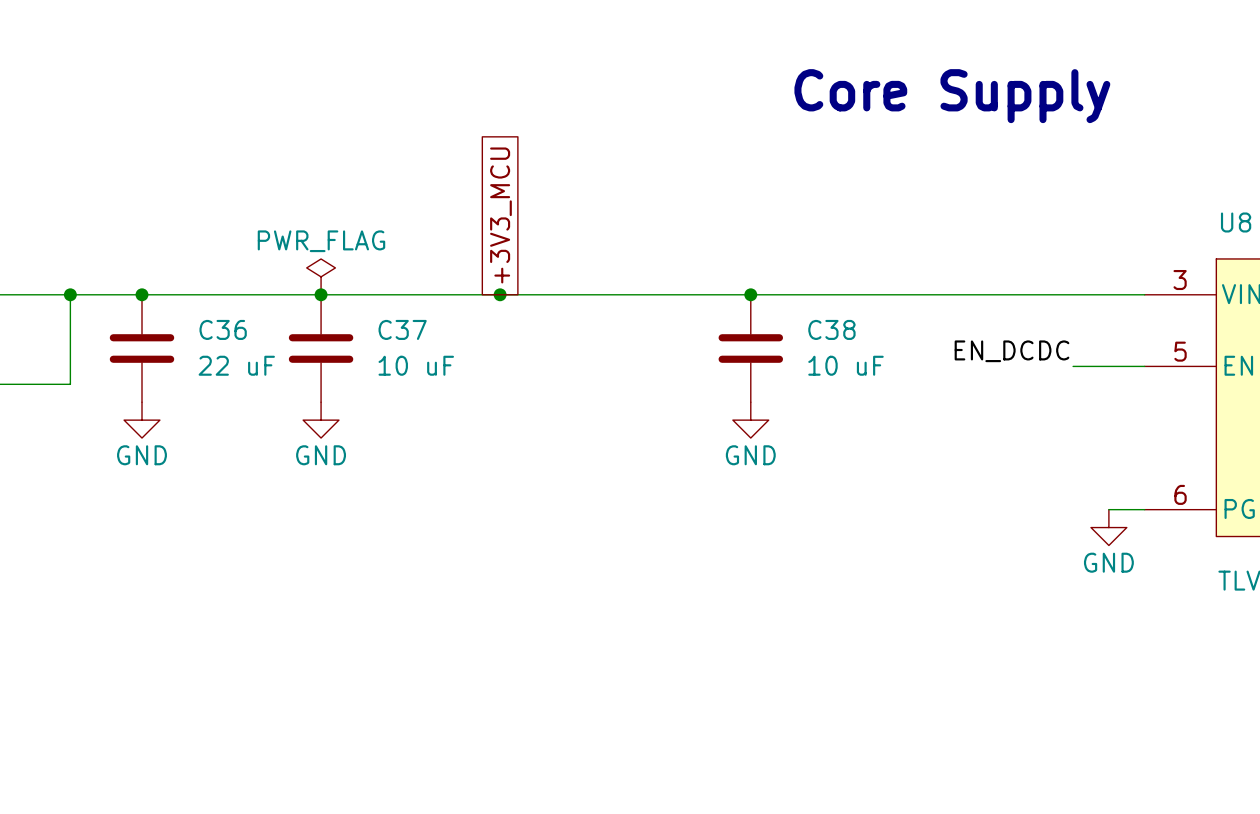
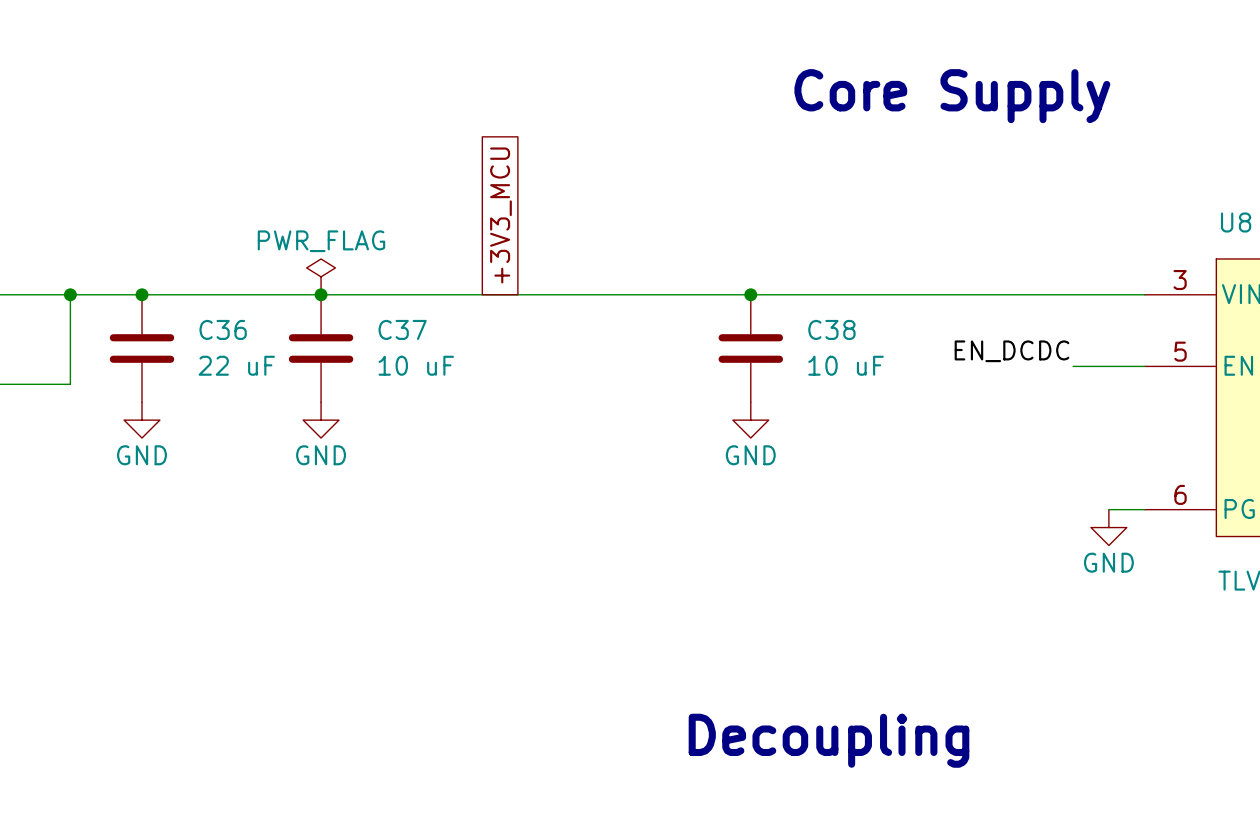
junction: (500, 294) -> none
text: none -> Decoupling (828, 740)

